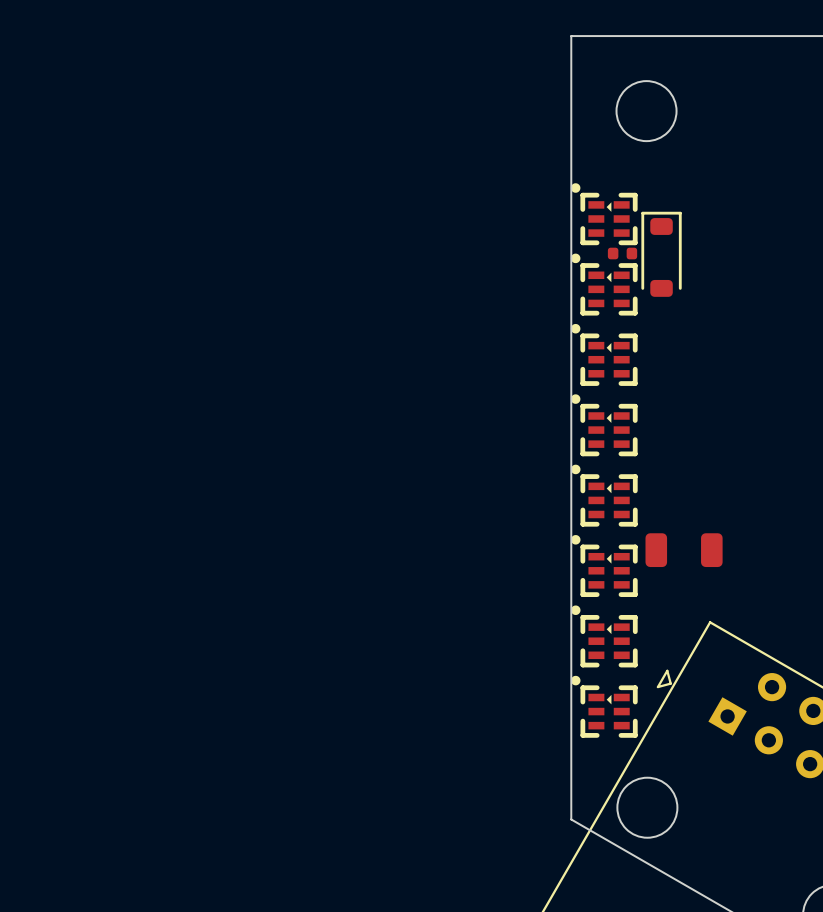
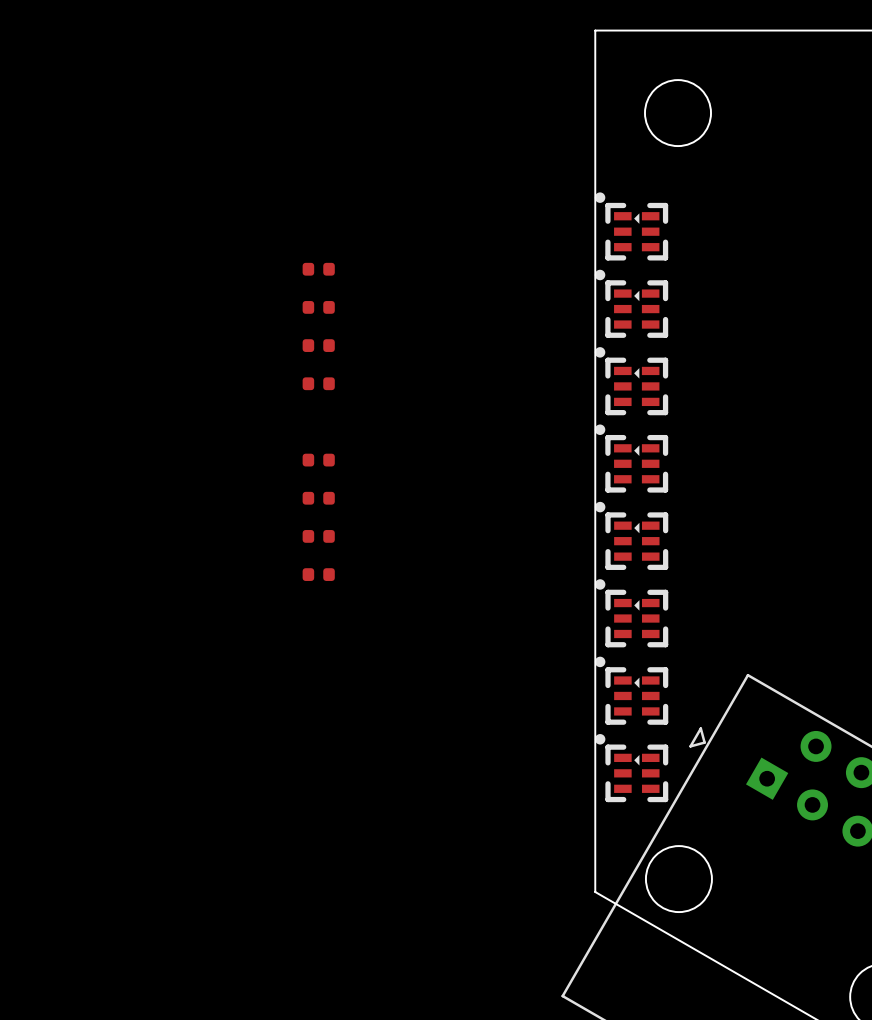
part: none -> (318, 269)
part: (622, 253) -> none
part: (661, 254) -> none
part: none -> (318, 307)
part: none -> (318, 345)
part: none -> (318, 383)
part: none -> (318, 460)
part: none -> (318, 498)
part: none -> (318, 536)
part: none -> (318, 574)
part: (684, 550) -> none

